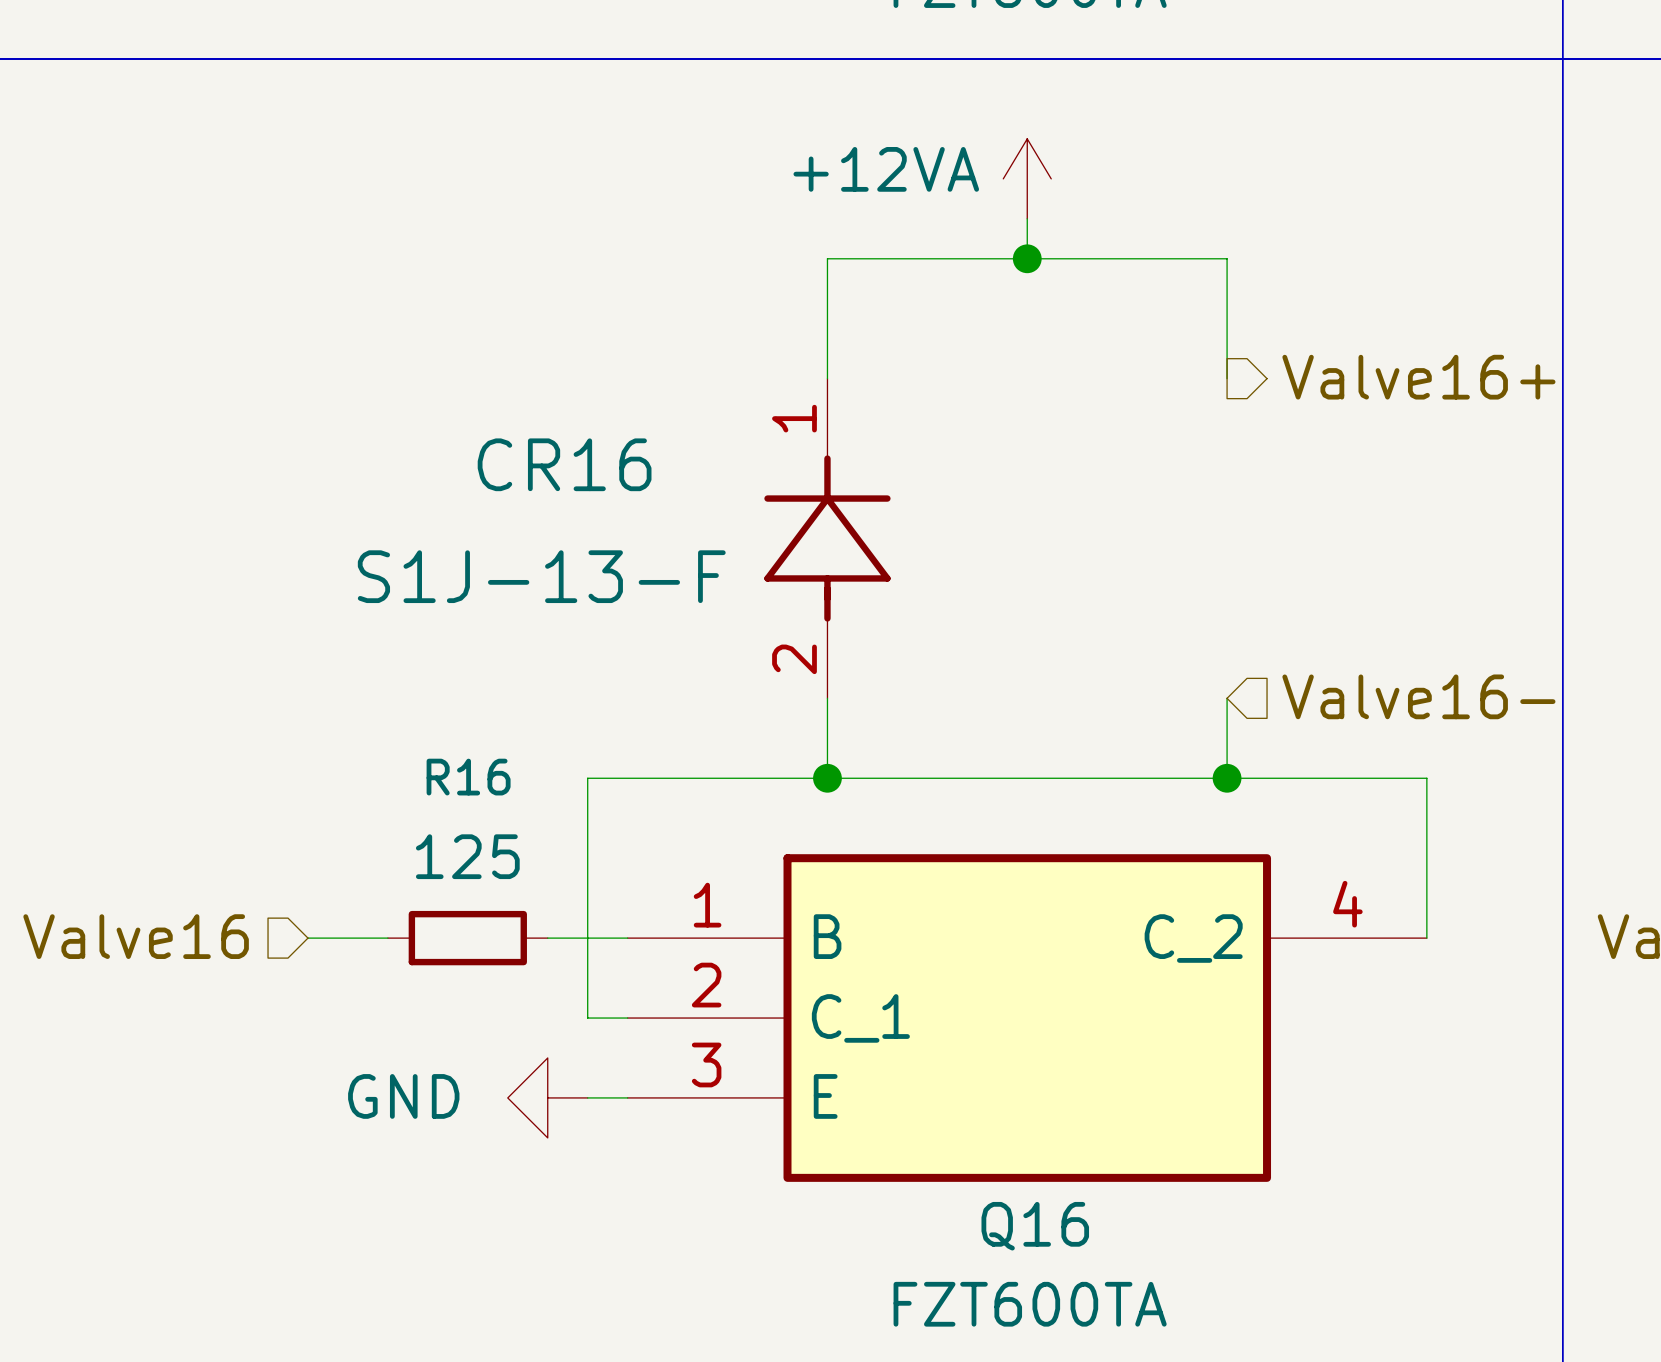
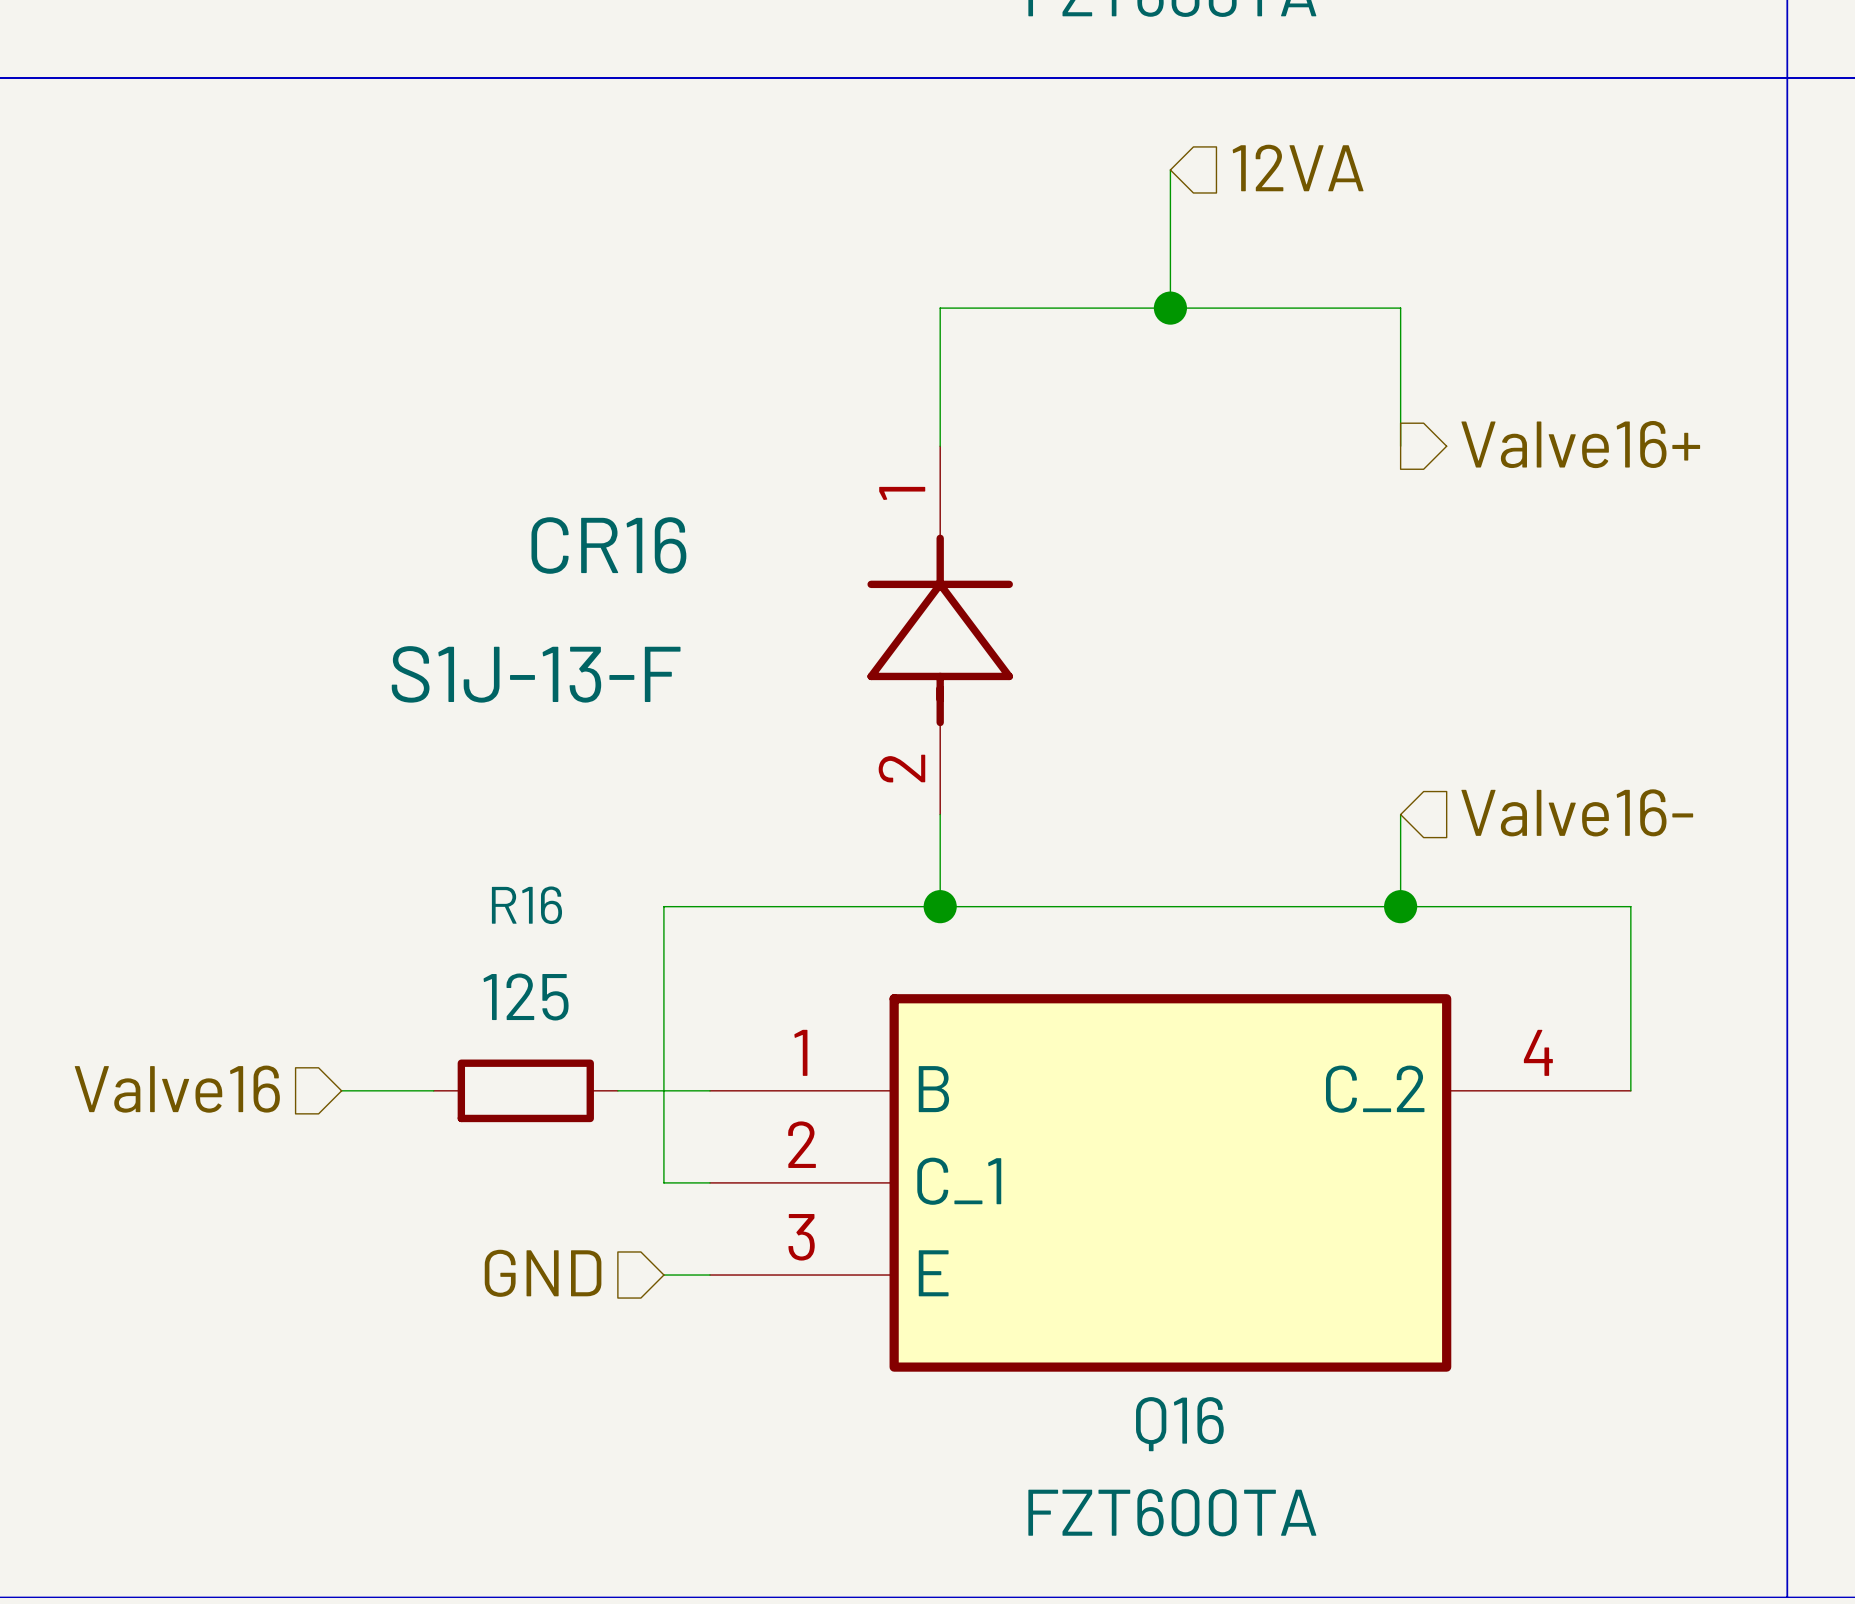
hierarchical label: none -> 12VA (1298, 167)
power symbol: +12VA (1027, 178) -> none
hierarchical label: none -> GND (543, 1273)
power symbol: GND (547, 1097) -> none

